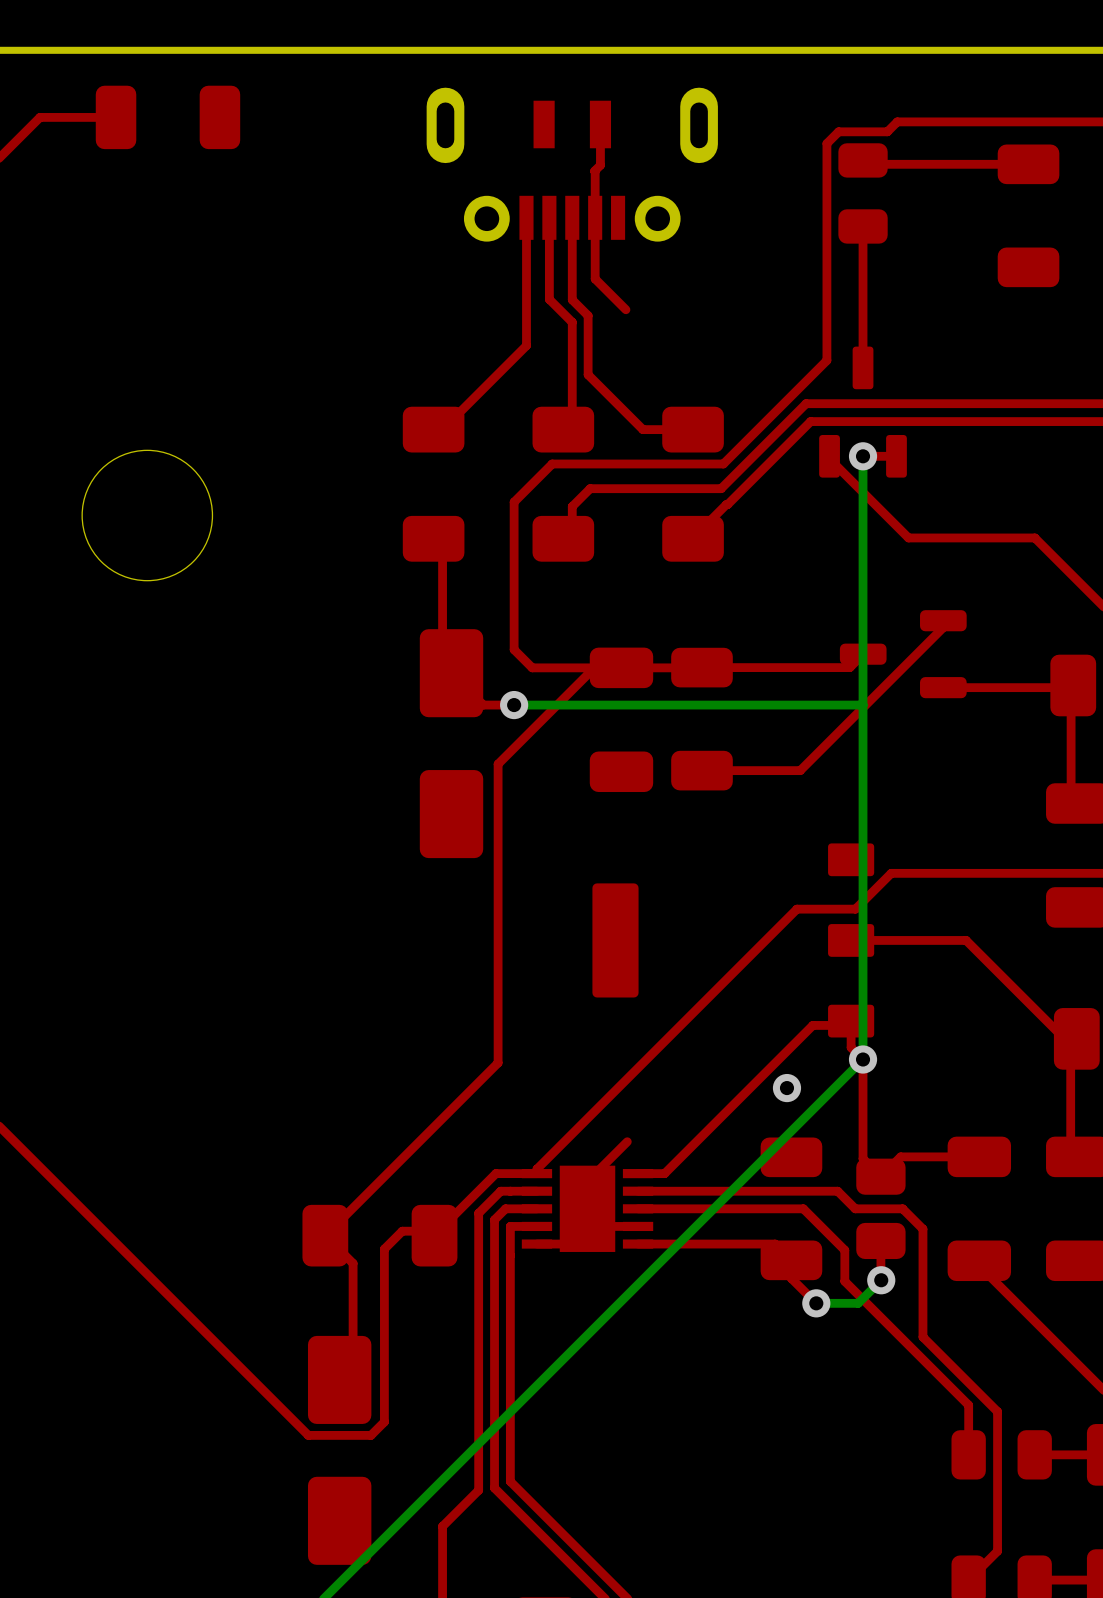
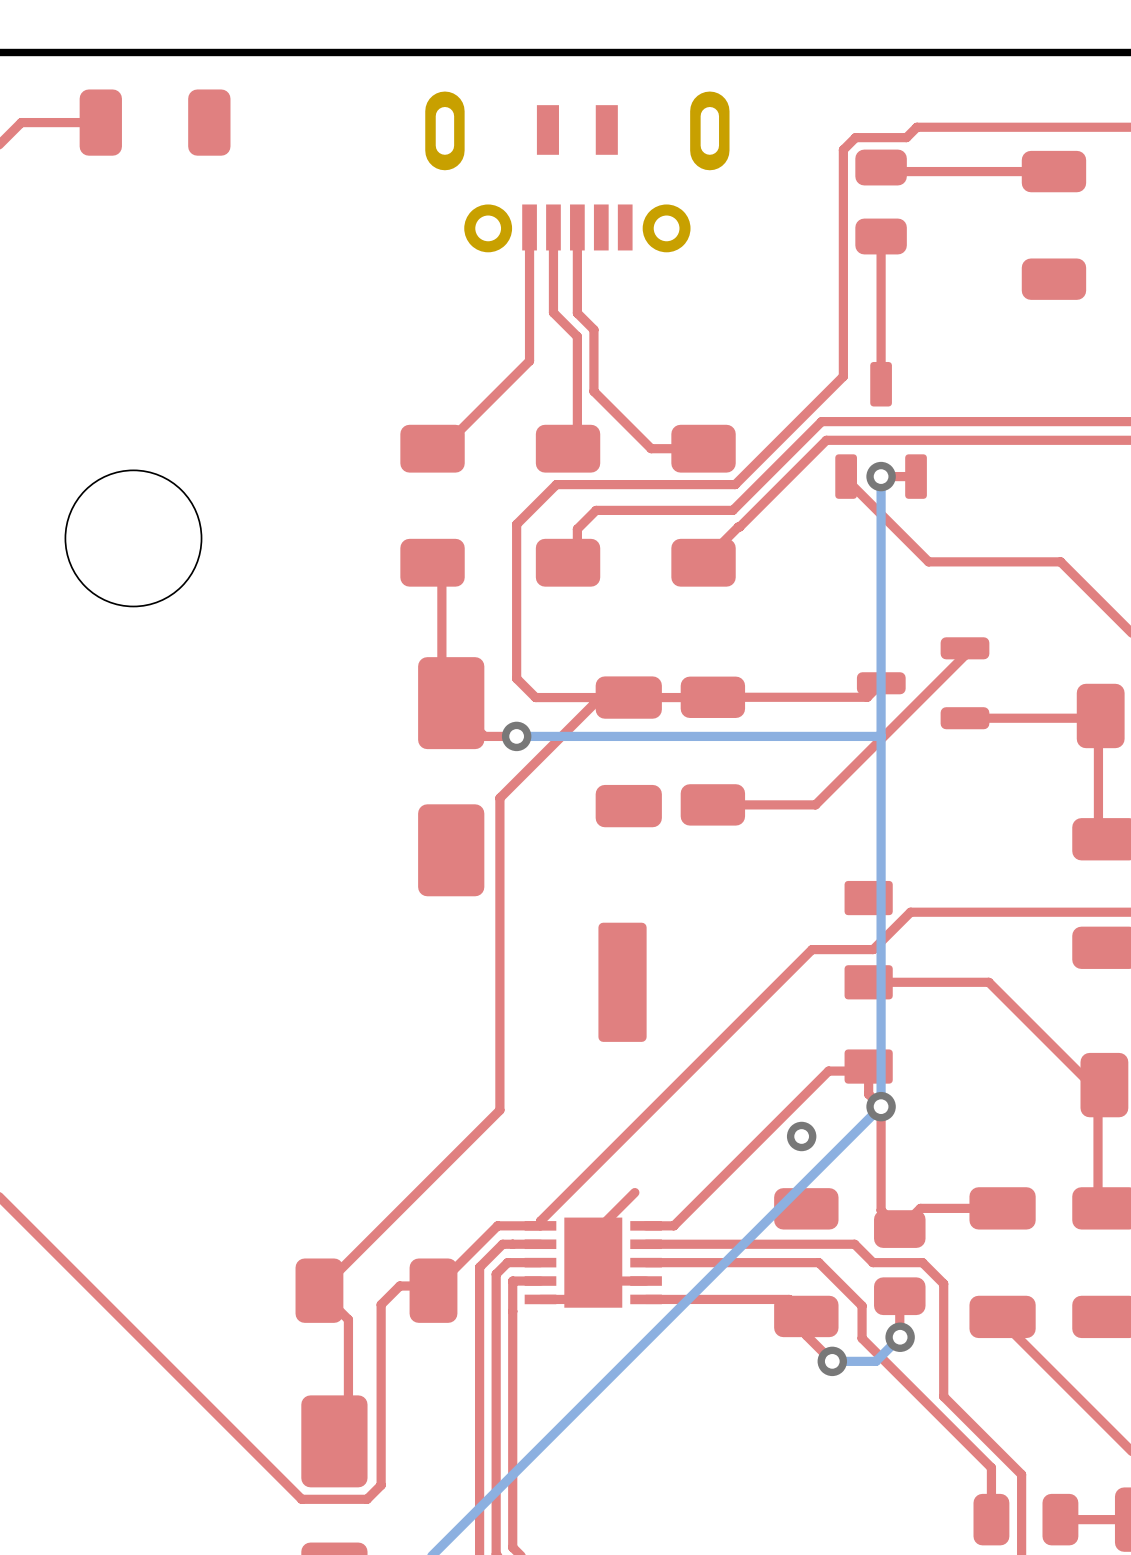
top track: (600, 124) (600, 165) (594, 171) (595, 278) (625, 309) -> none

